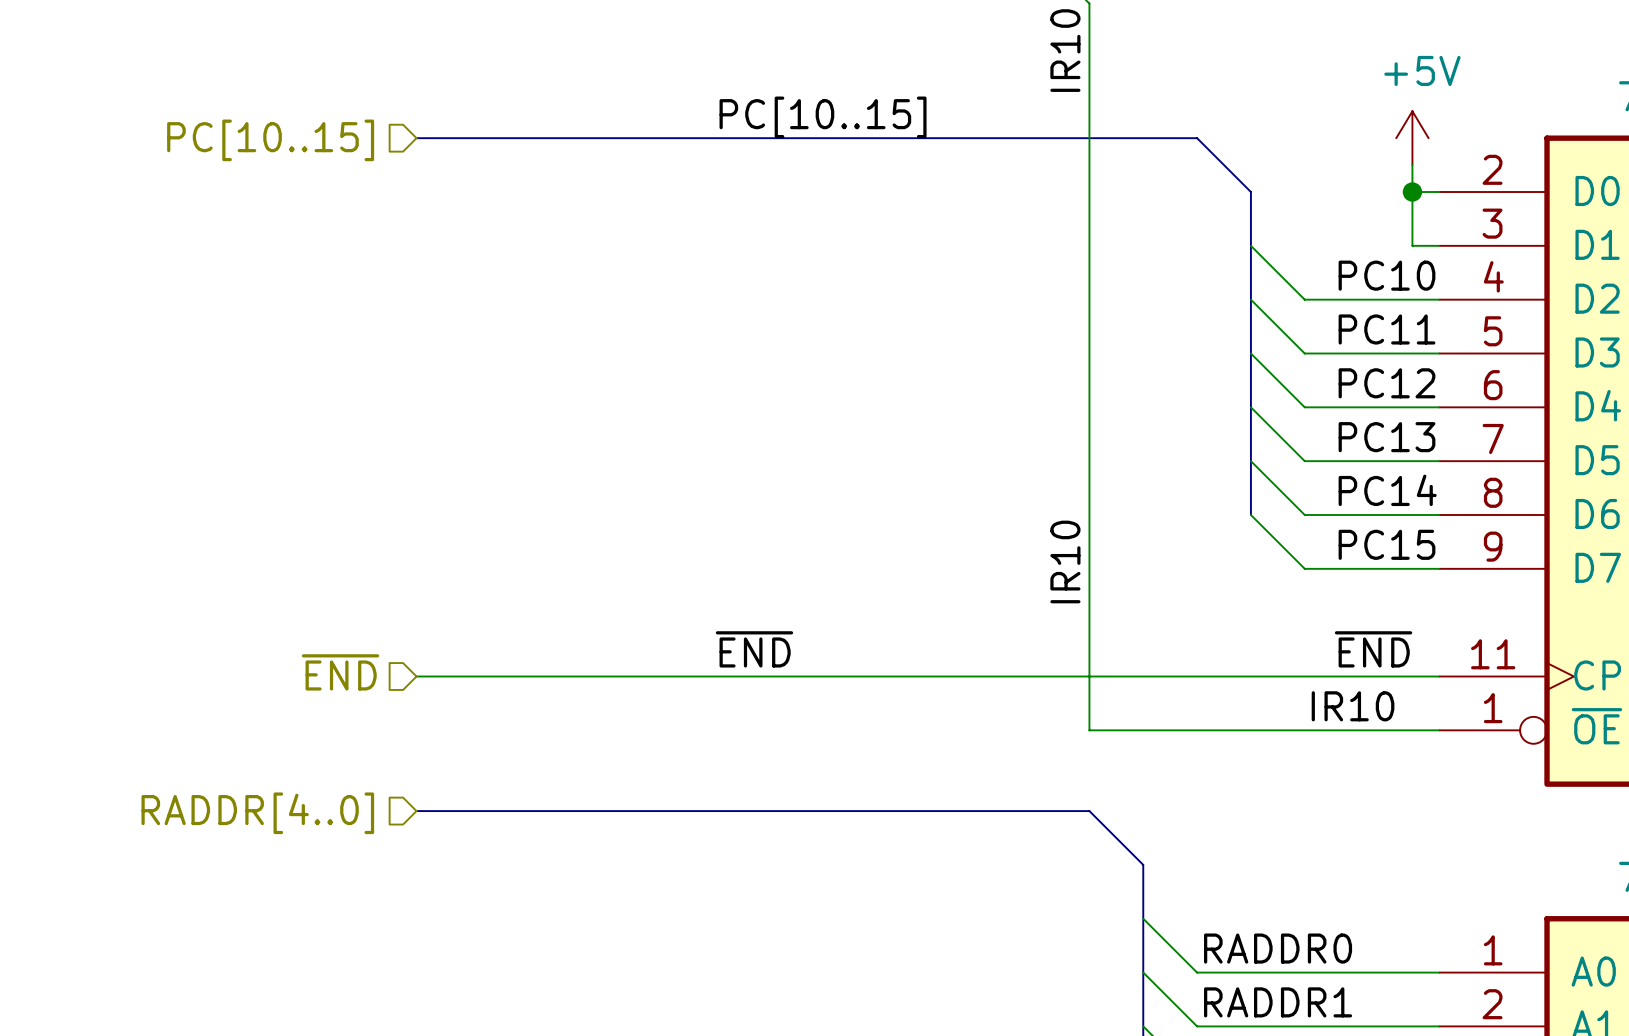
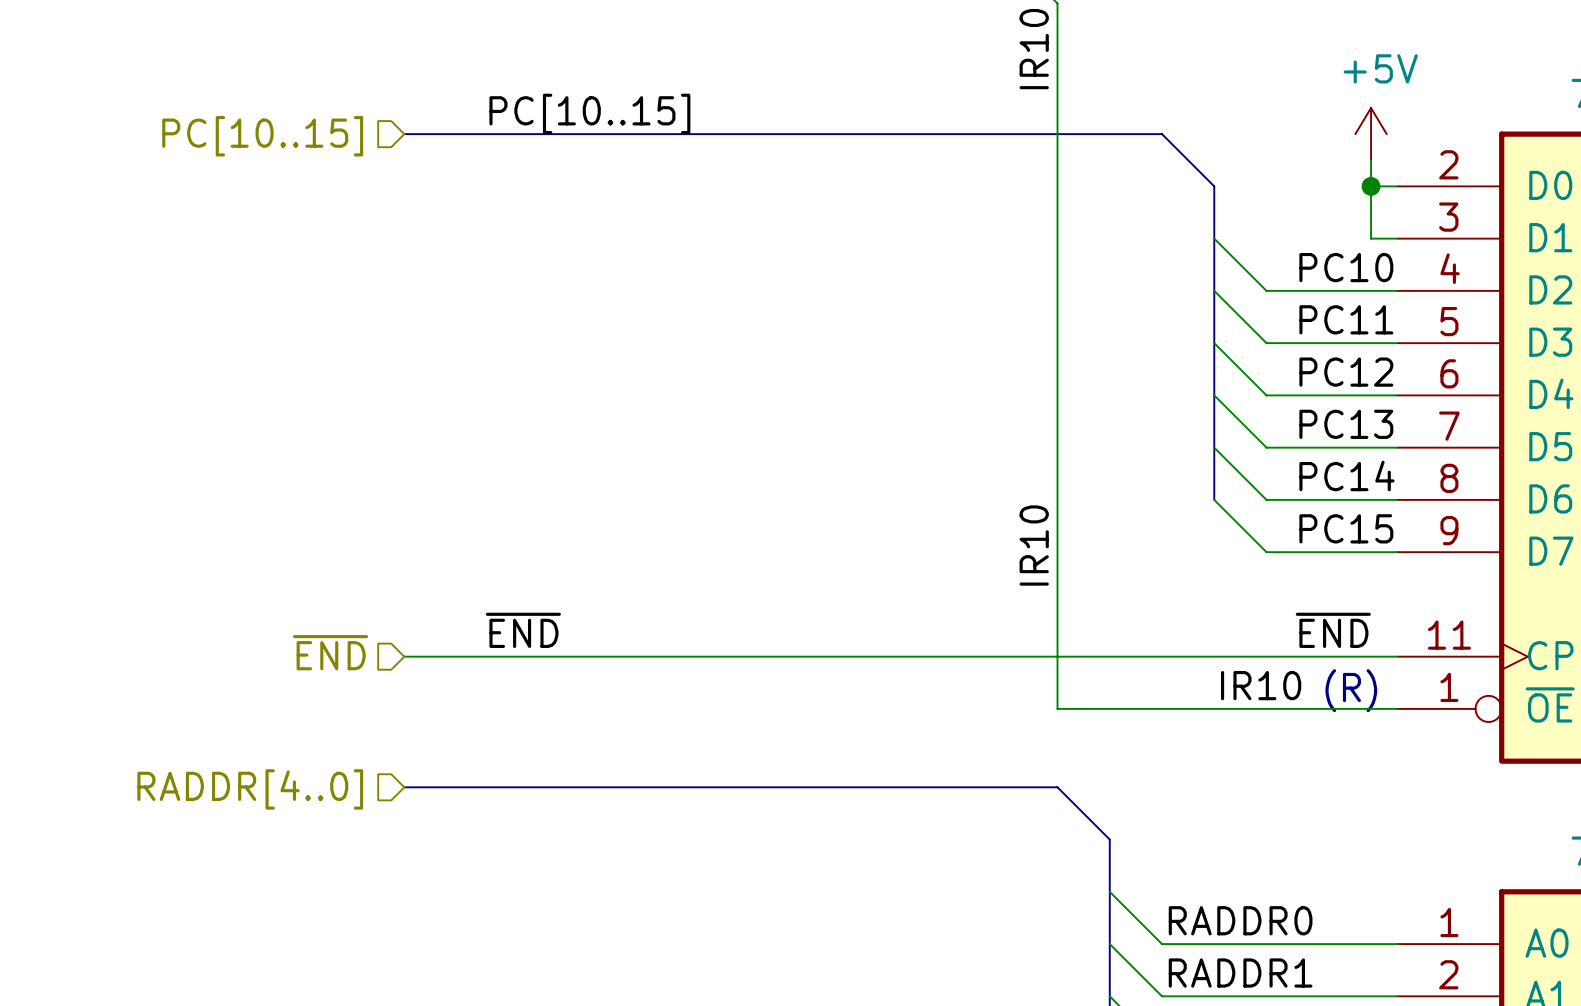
label position: PC[10..15] (823, 117) -> PC[10..15] (589, 113)
label position: ~{END} (754, 649) -> ~{END} (523, 630)
label position: IR10 (1353, 706) -> IR10 (1261, 685)
text: none -> (R) (1351, 690)

